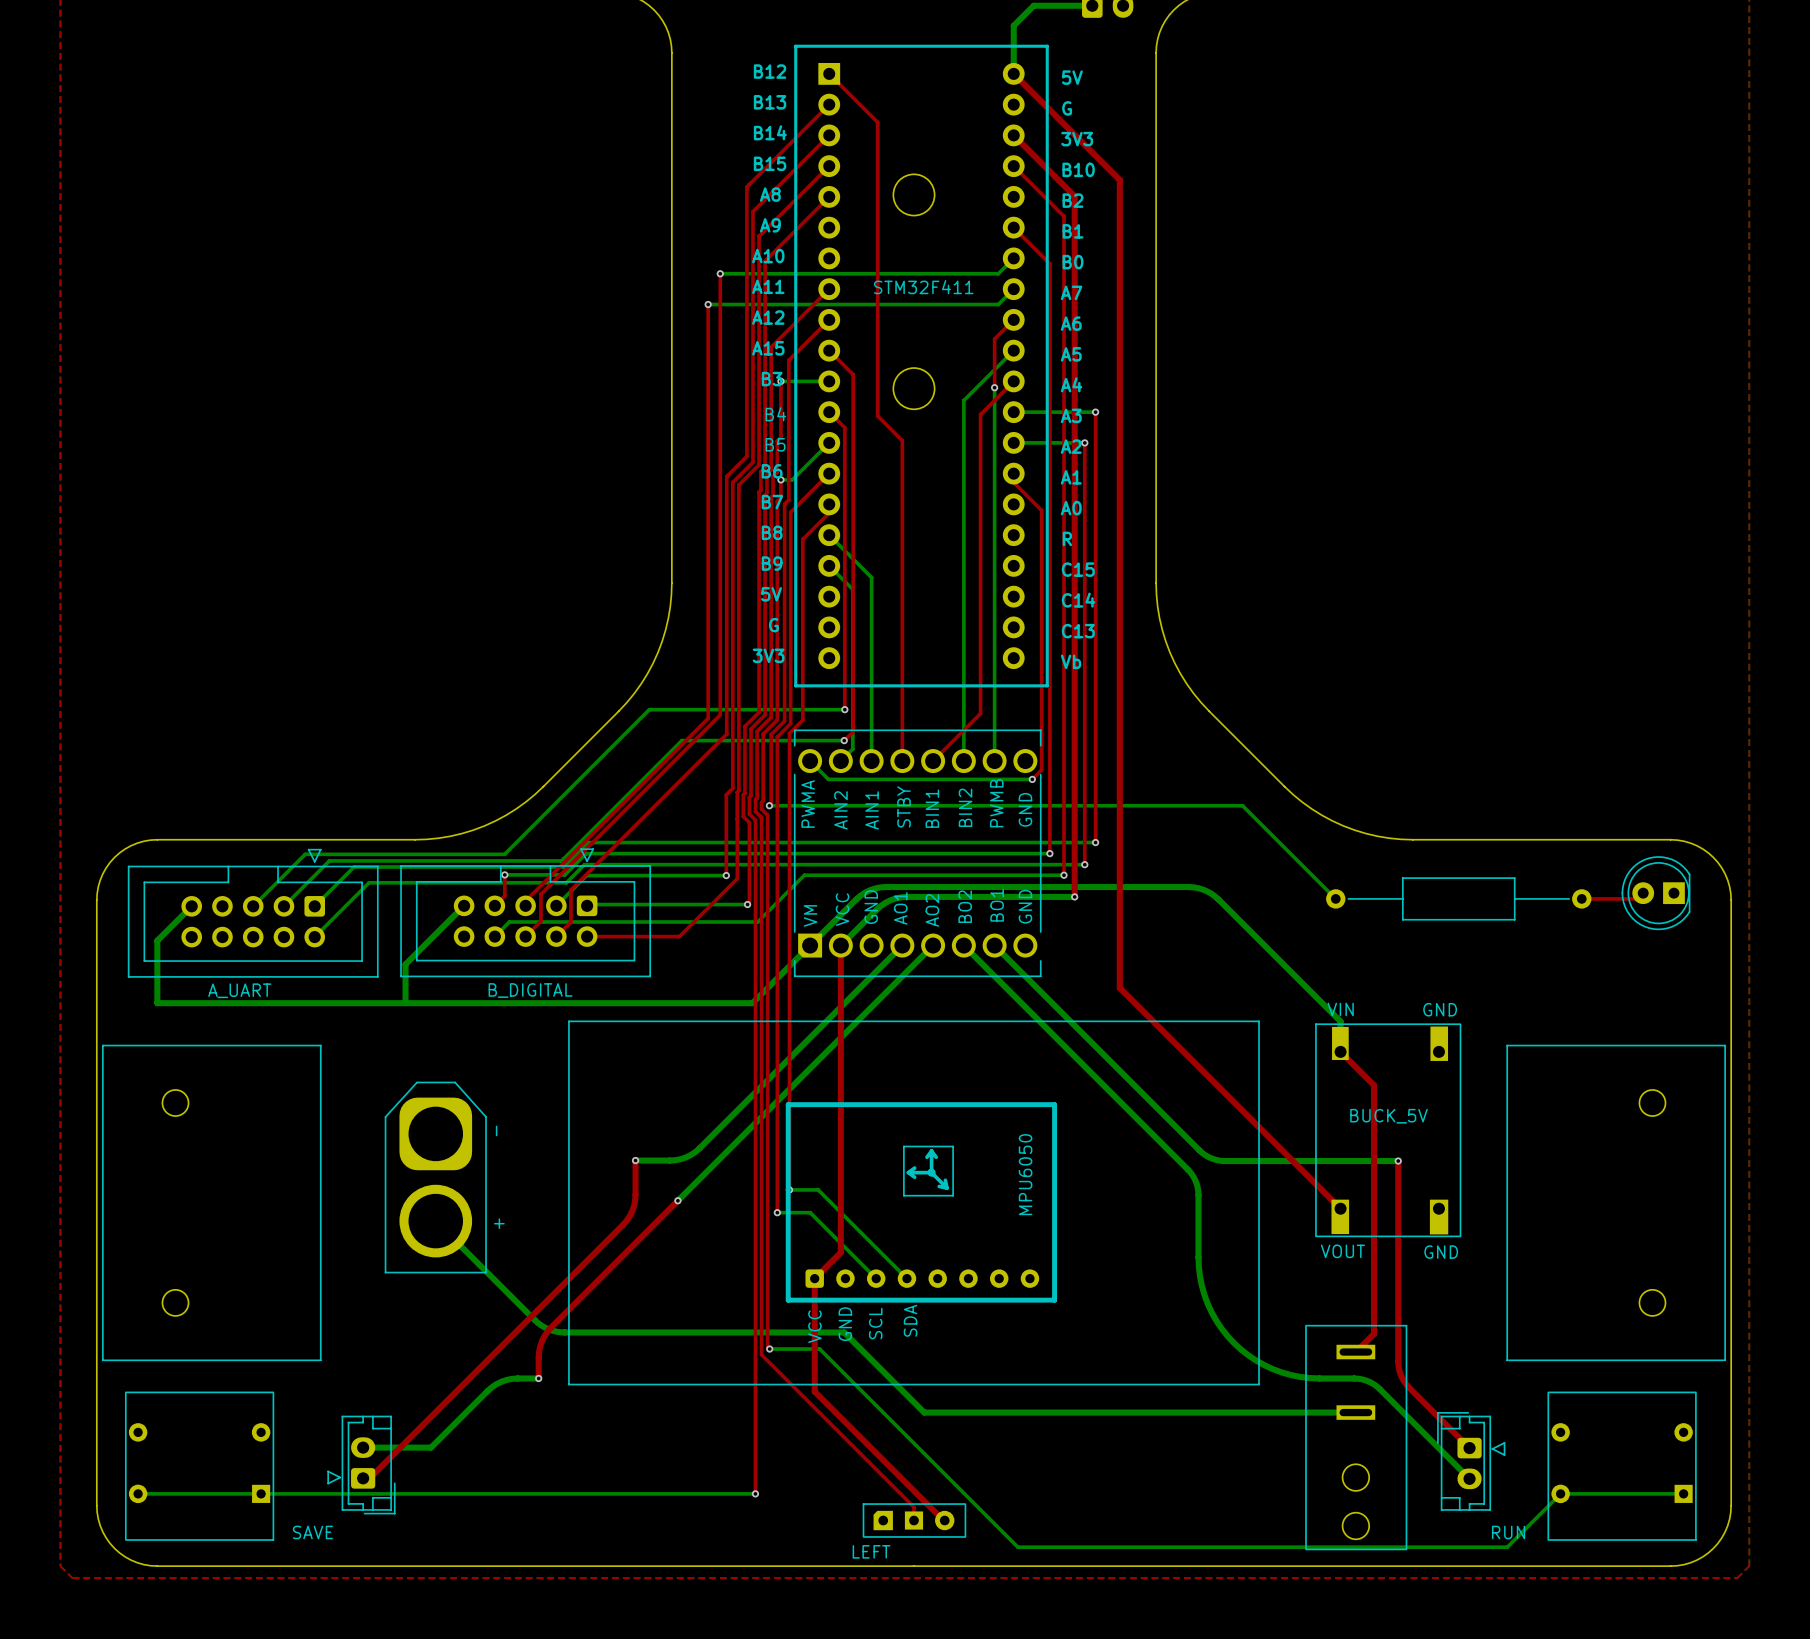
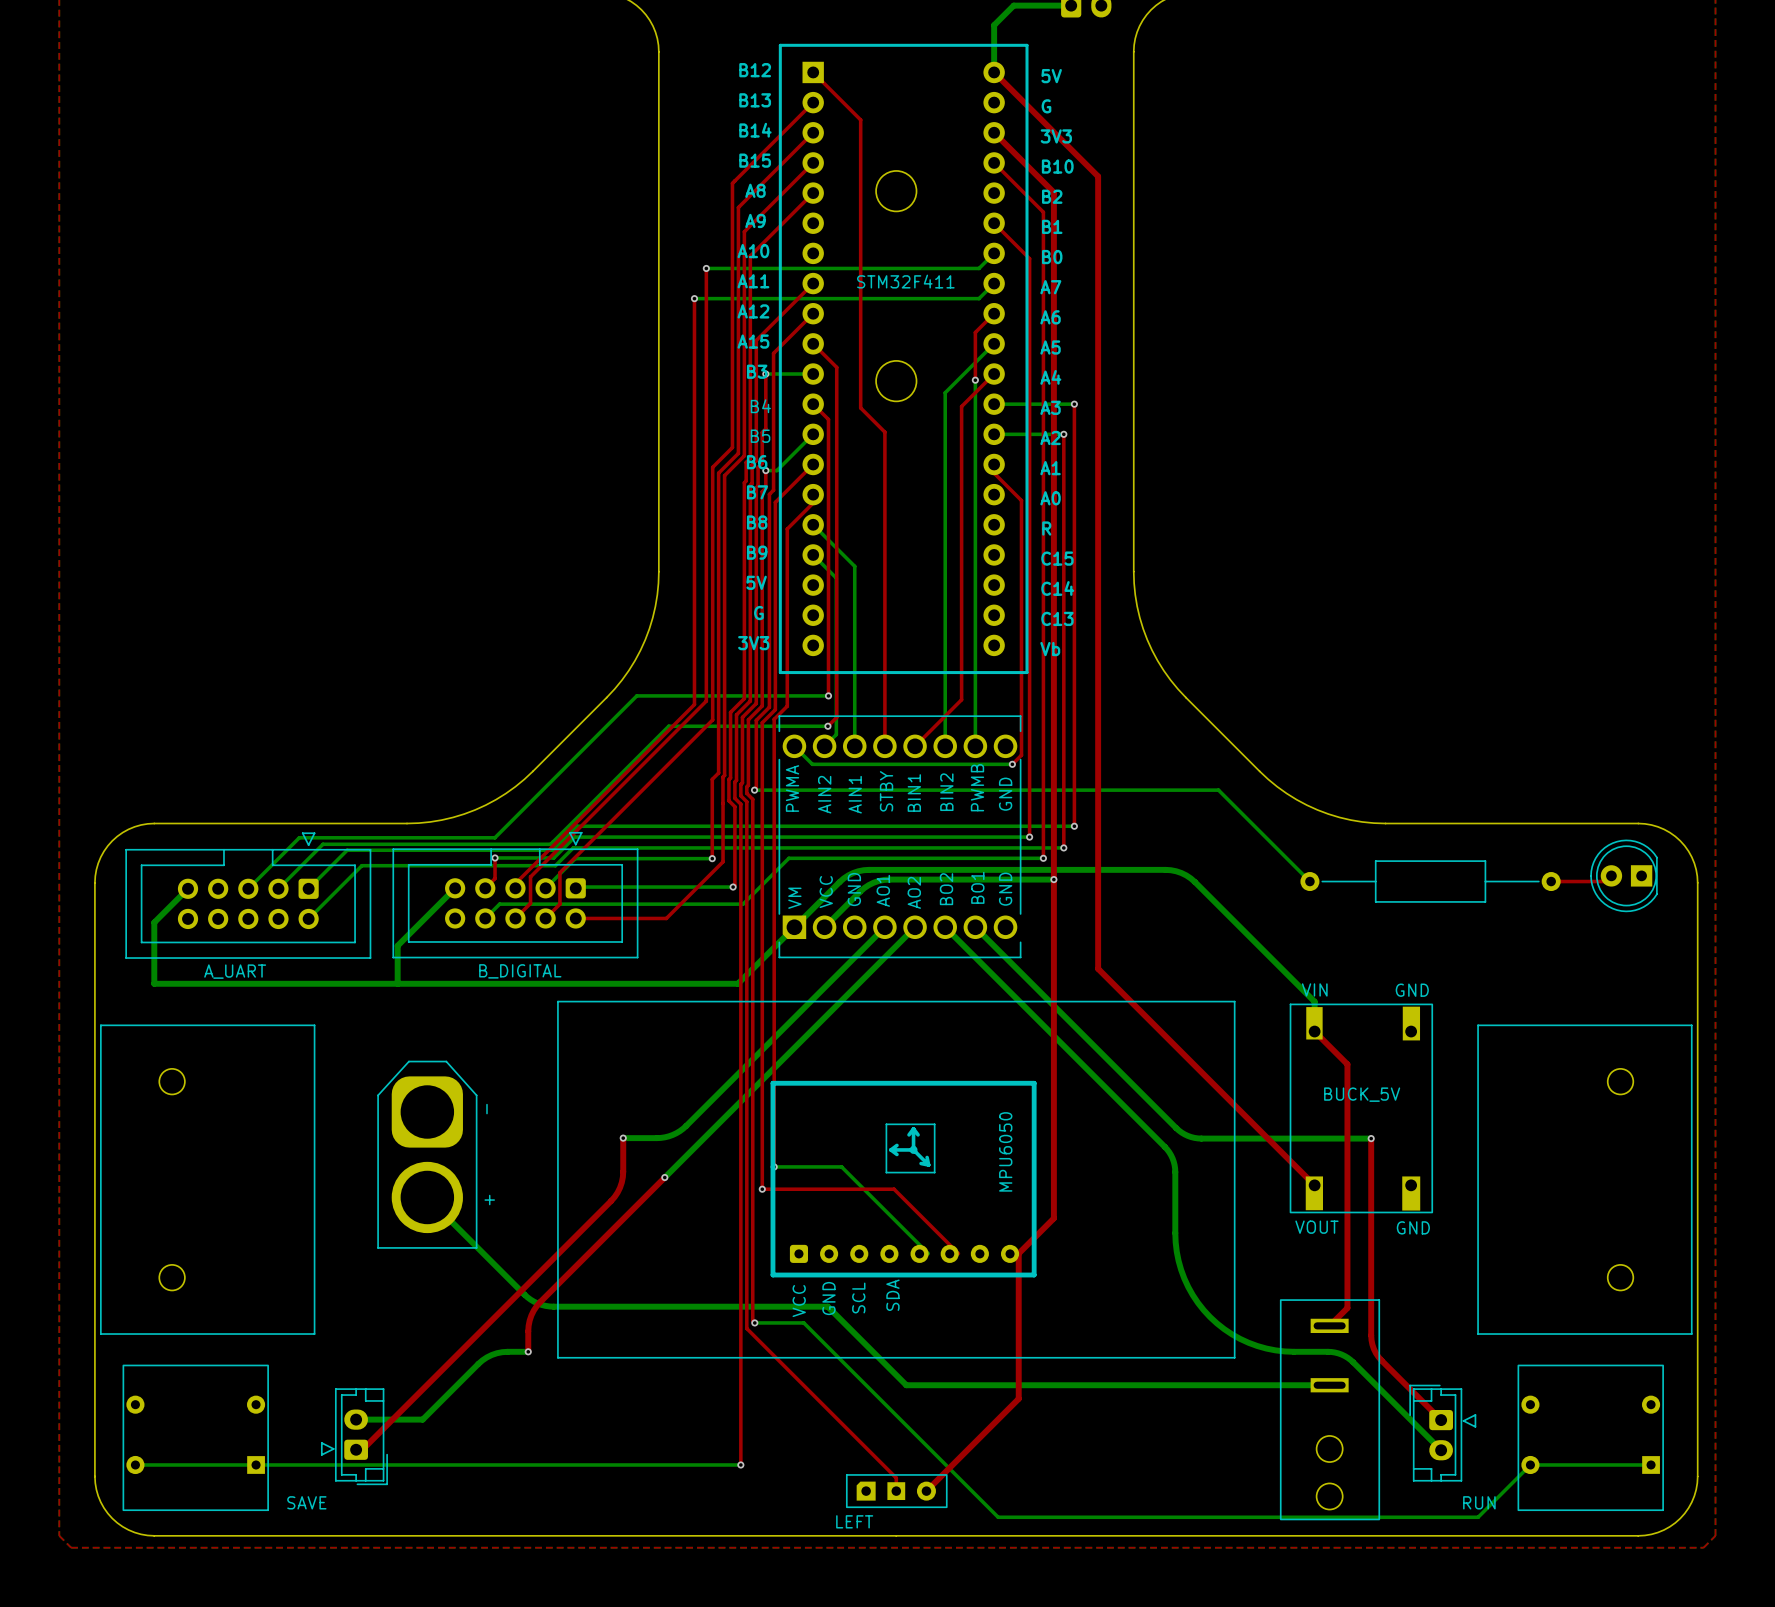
top track: none -> (1053, 879) (1053, 1218) (1018, 1253) (1018, 1398) (926, 1491)
top track: (840, 945) (840, 1252) (814, 1278) (814, 1391) (943, 1520) -> none
bottom track: (818, 1189) (906, 1278) -> (802, 1166) (841, 1166) (928, 1253)
bottom track: (777, 1212) (810, 1212) (876, 1278) -> none
top track: none -> (762, 1189) (894, 1189) (958, 1253)

